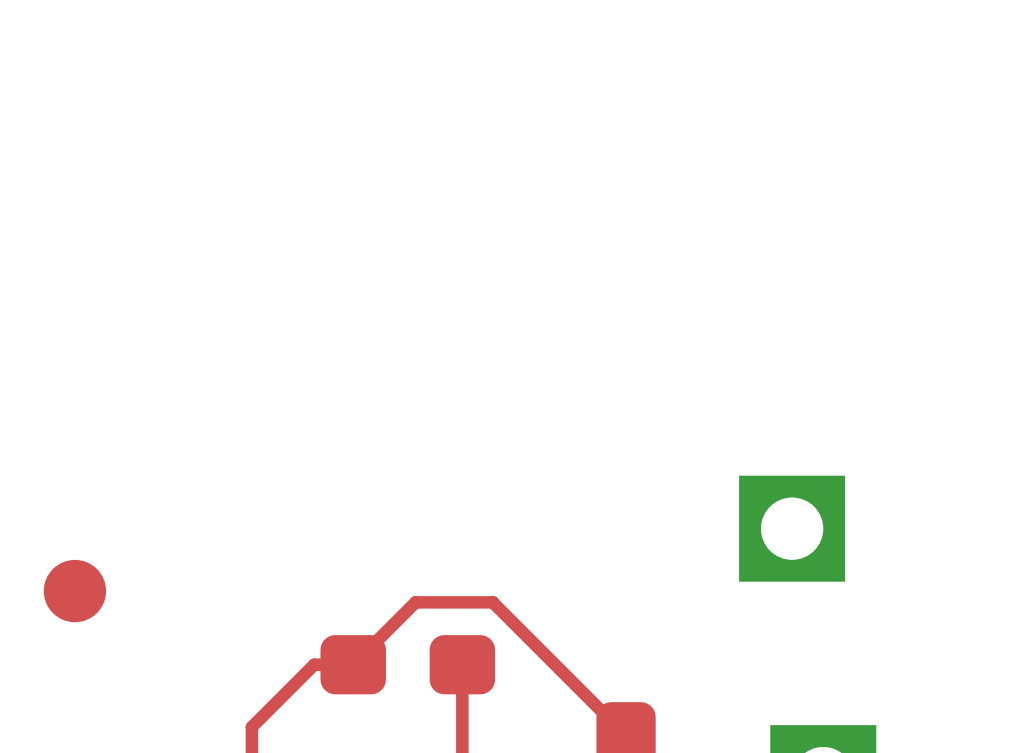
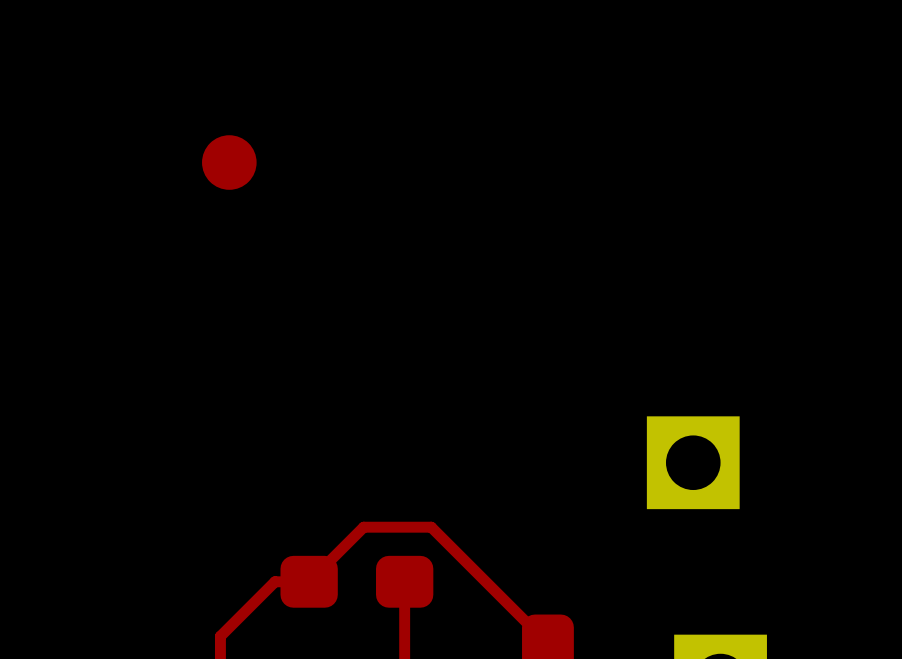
part position: (74, 591) -> (229, 162)

